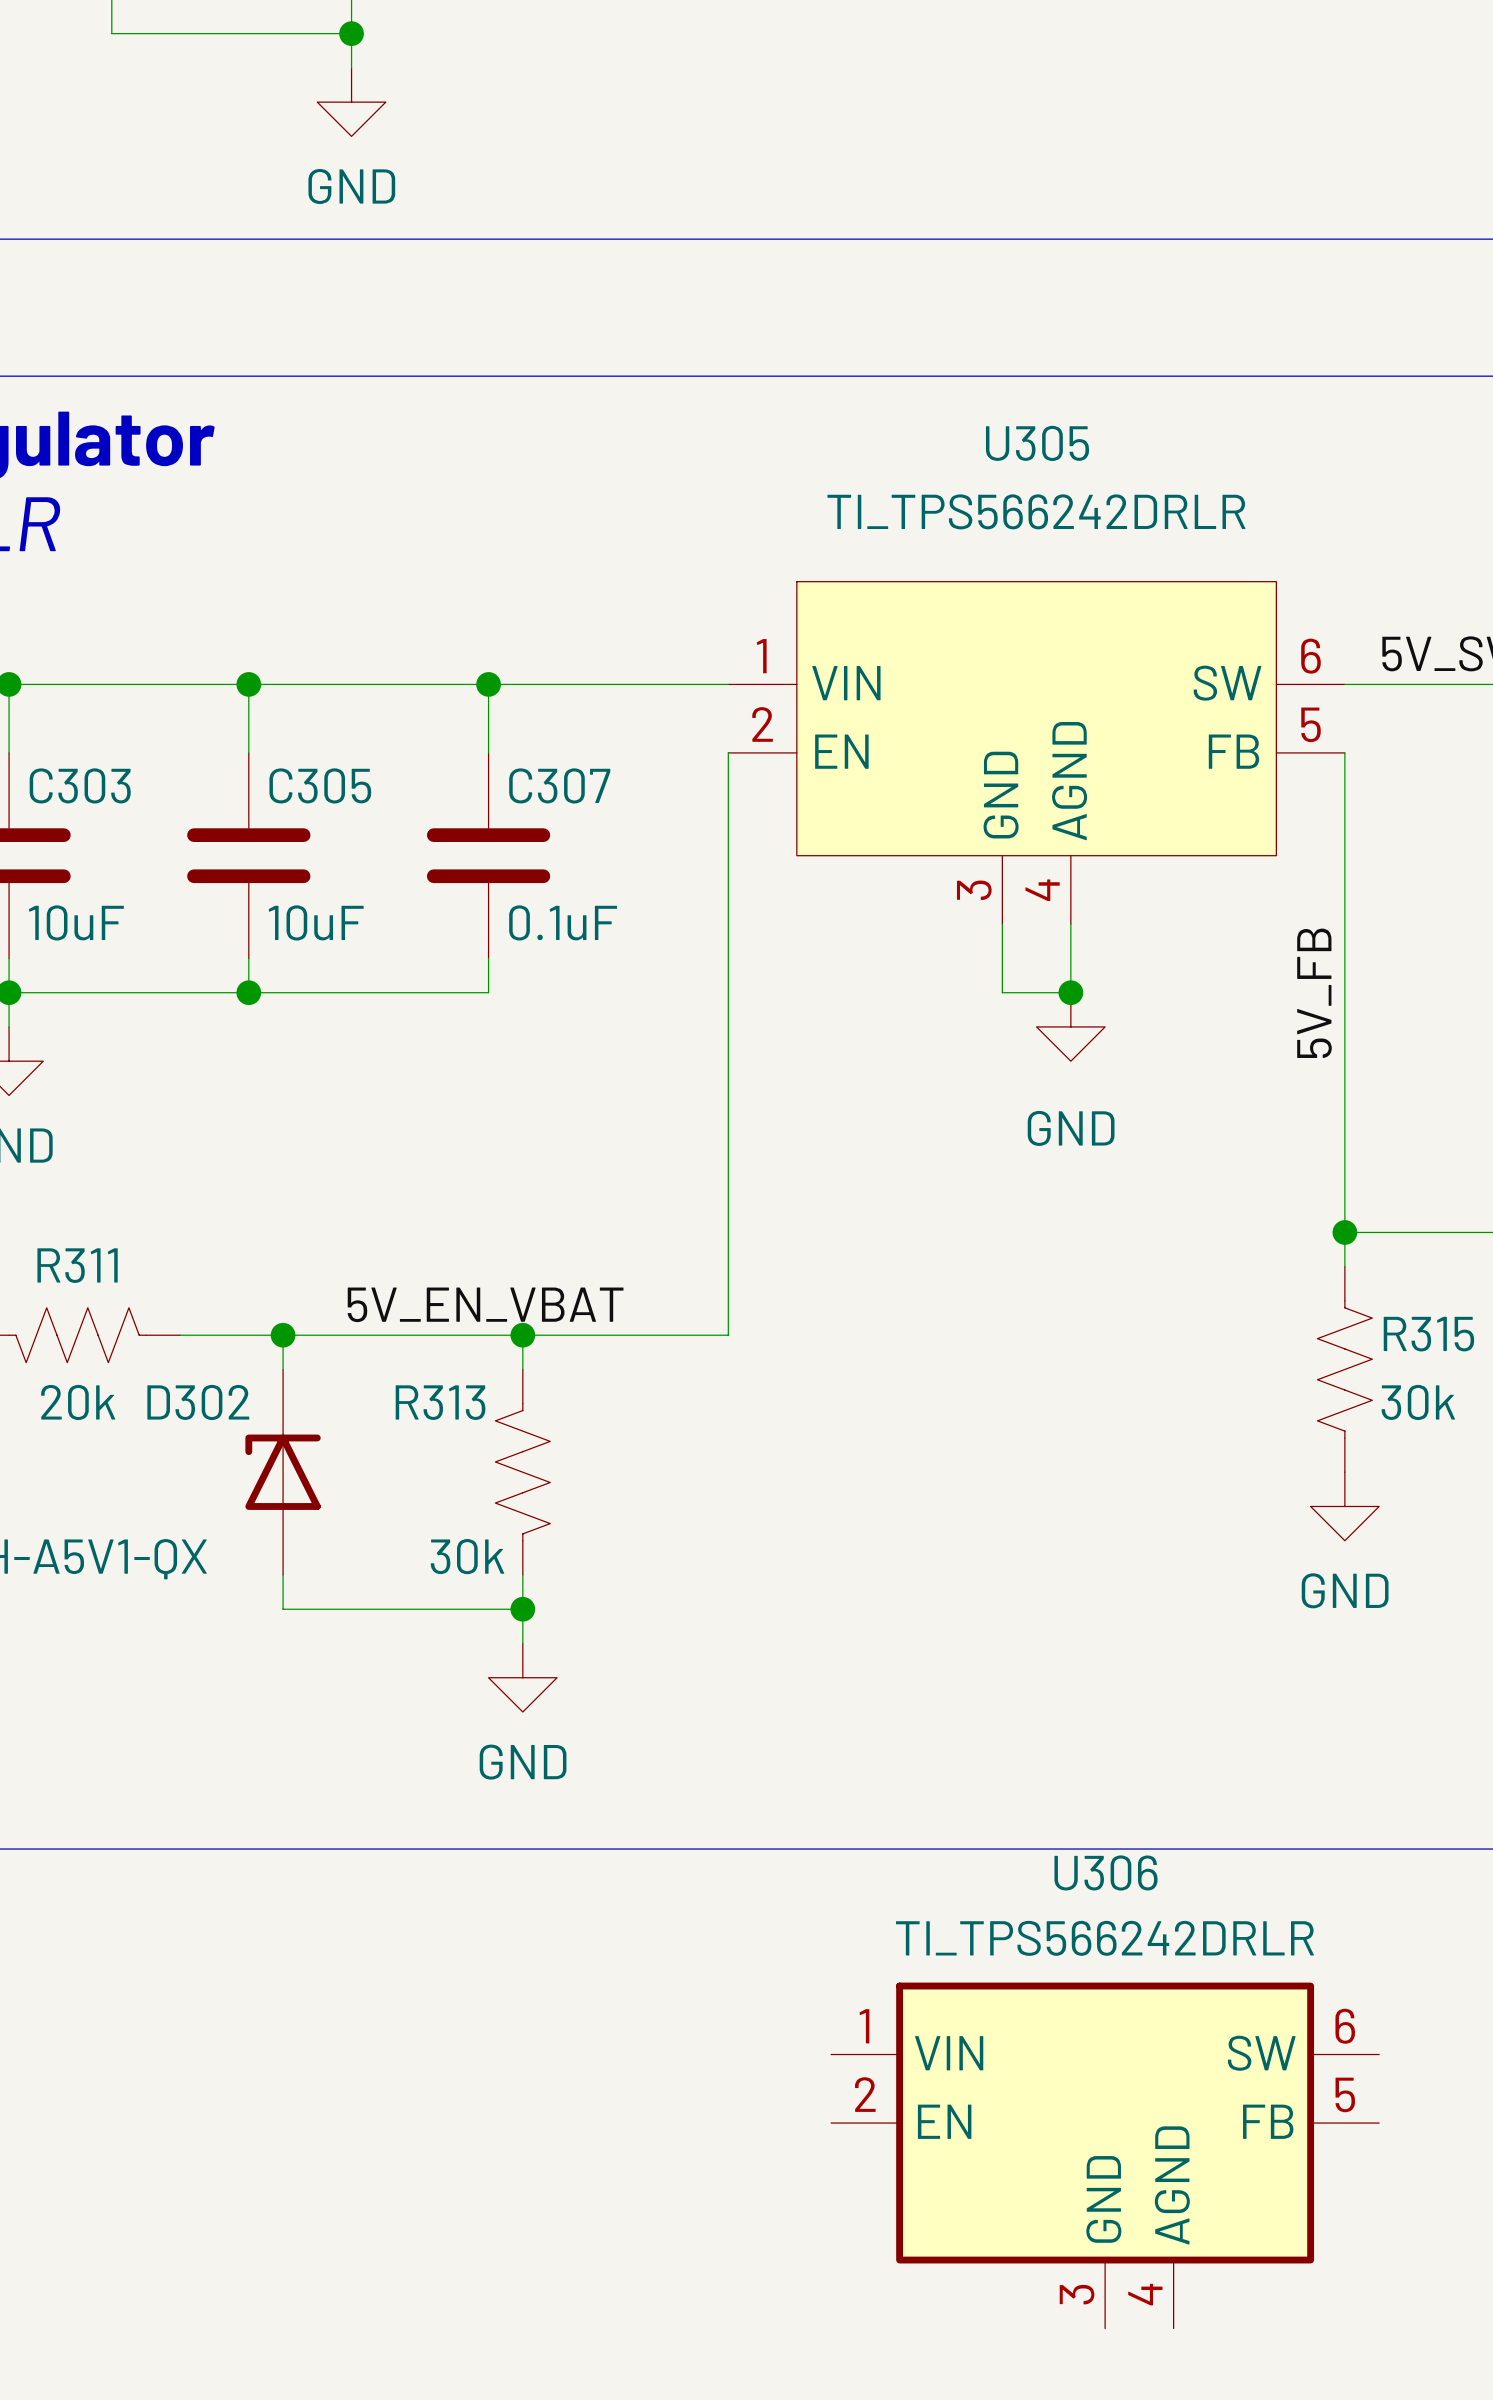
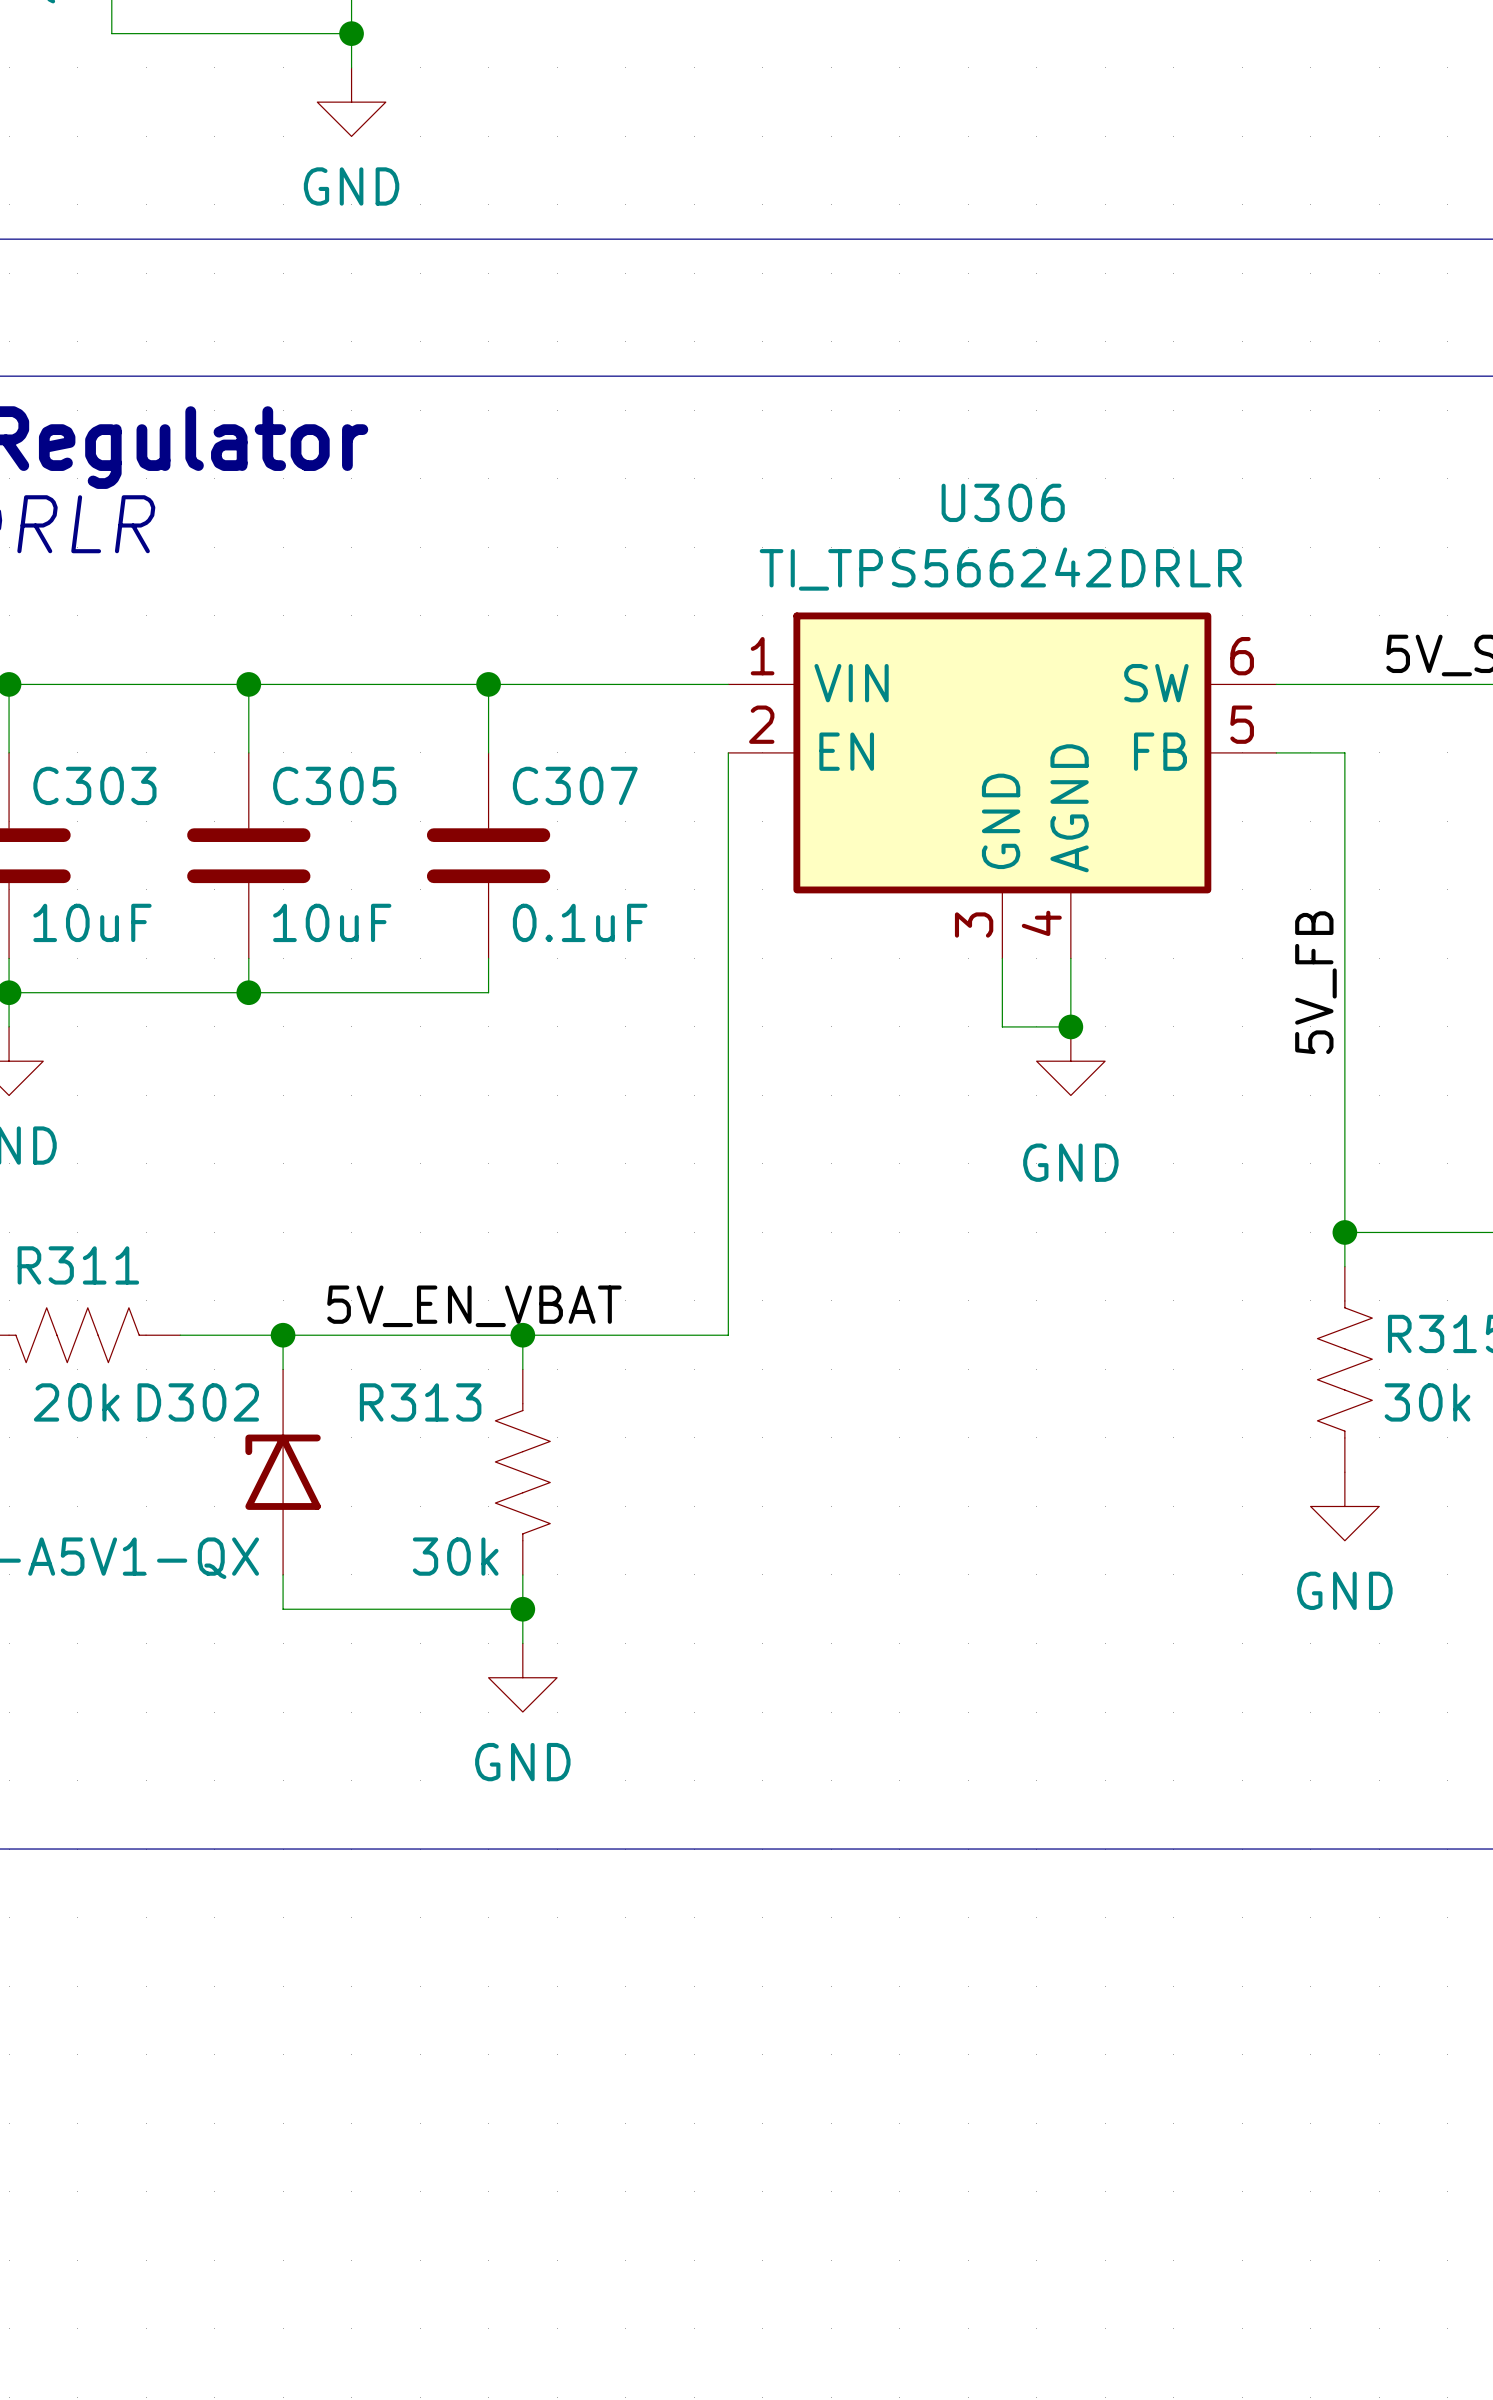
U305: TI_TPS566242DRLR (1036, 752) -> none
wire: (1002, 992) (1070, 992) -> (1002, 992) (1002, 1026) (1070, 1026) (1070, 992)
junction position: (1070, 992) -> (1070, 1026)
power symbol position: GND (1070, 1026) -> GND (1070, 1061)
U306 position: (1105, 2155) -> (1002, 785)

